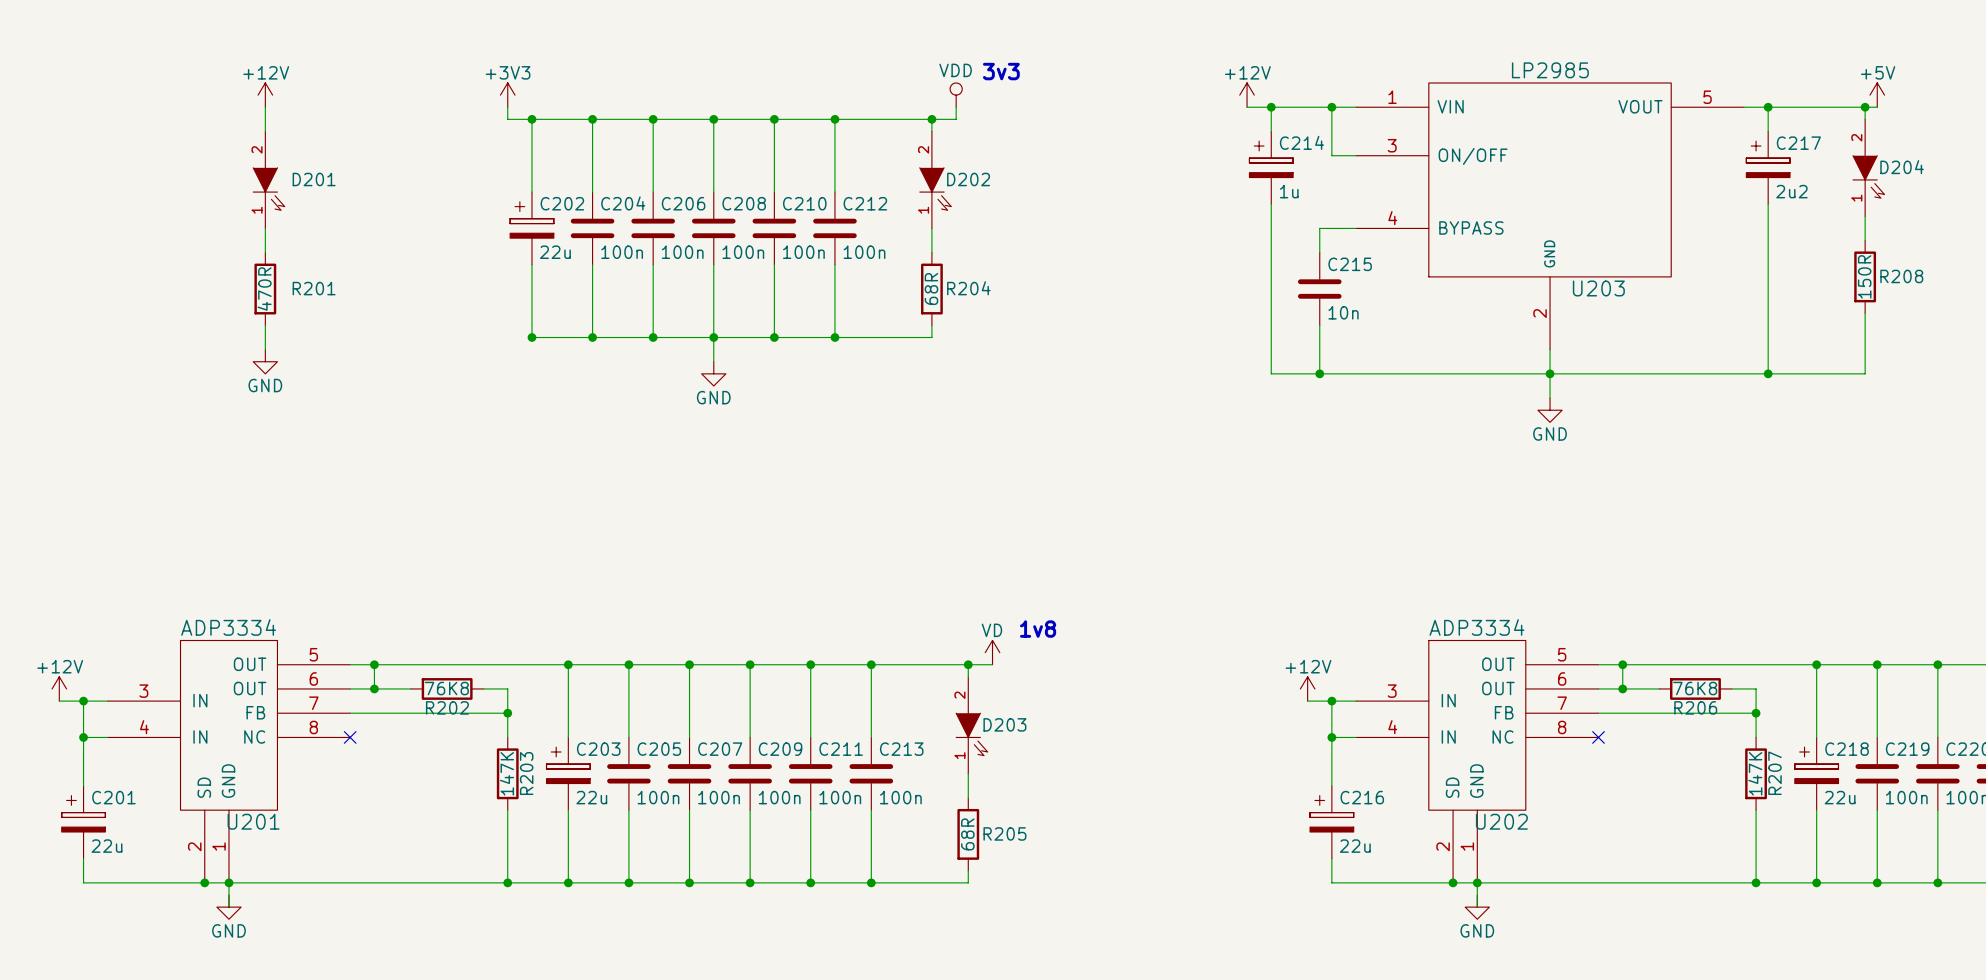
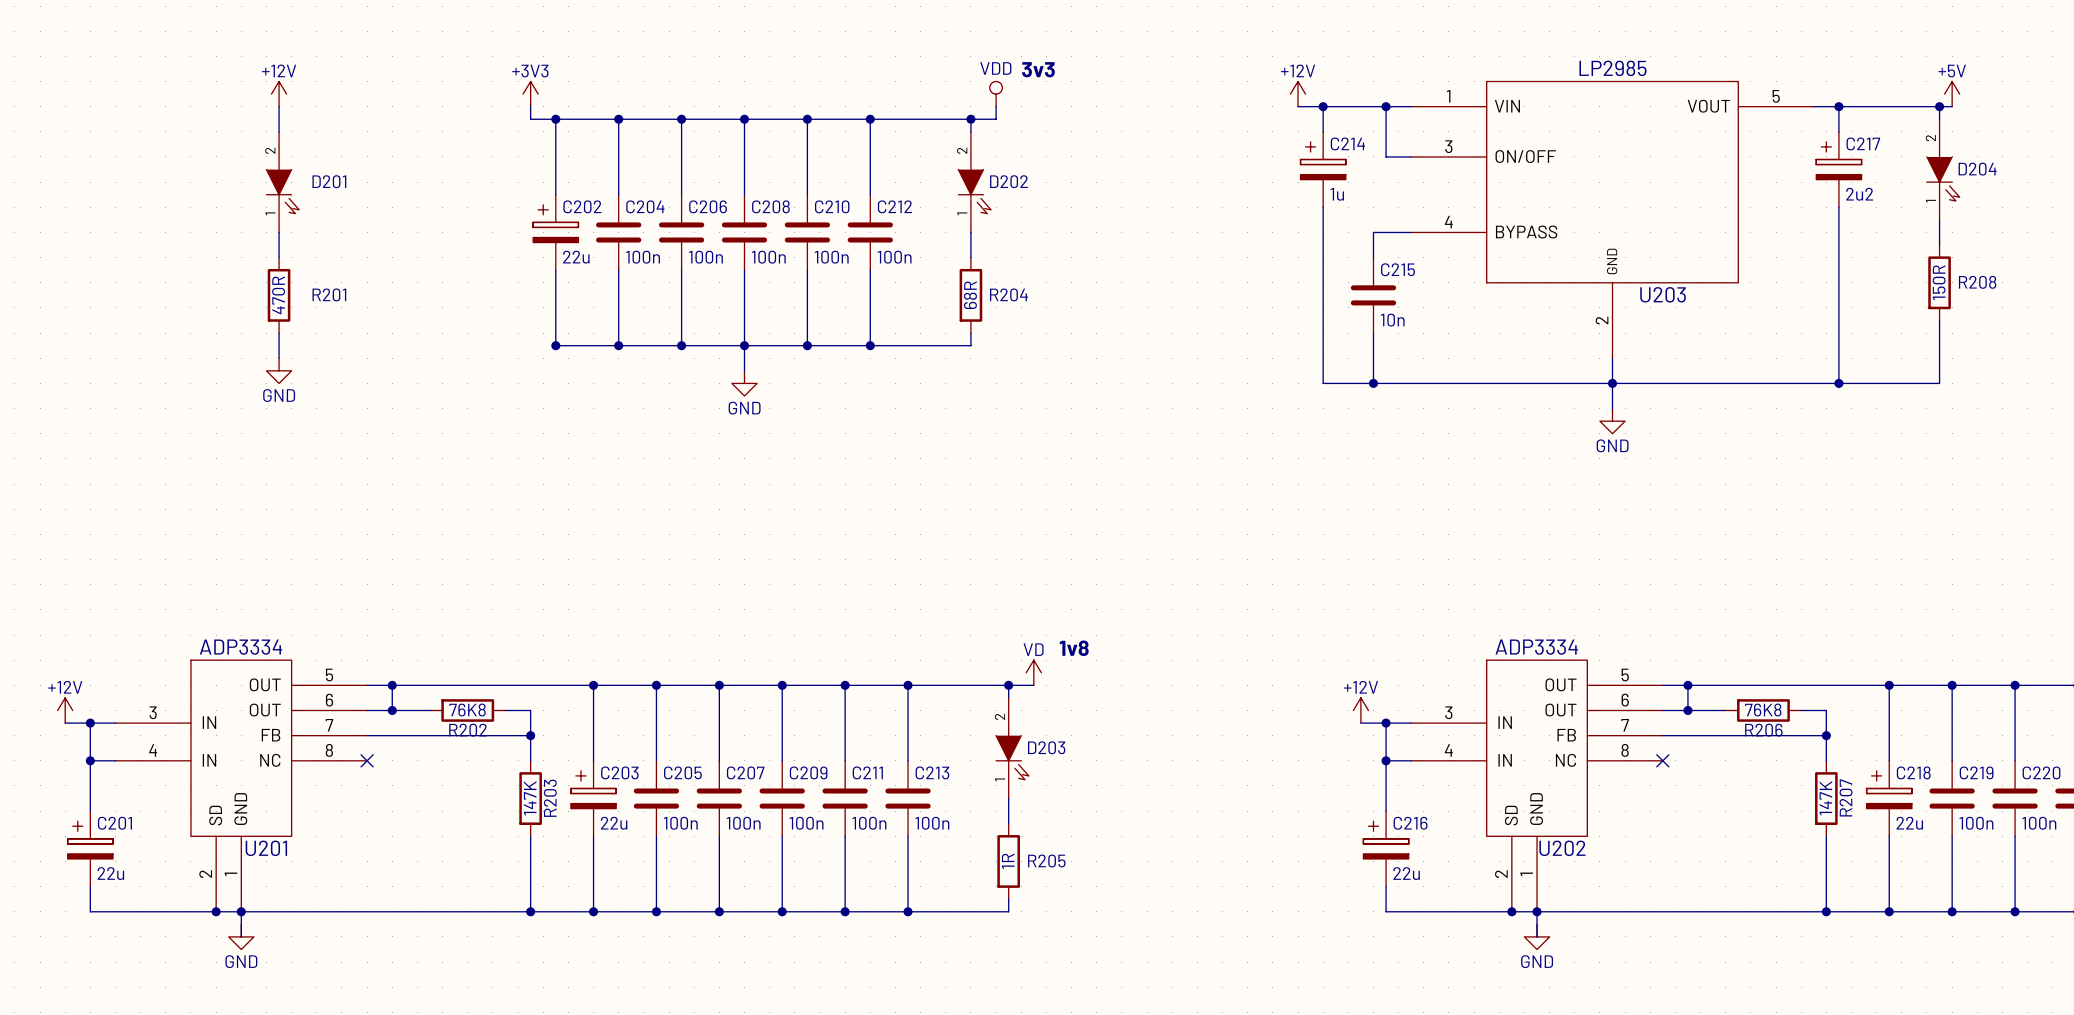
R205 value: 68R (967, 834) -> 1R (1008, 861)

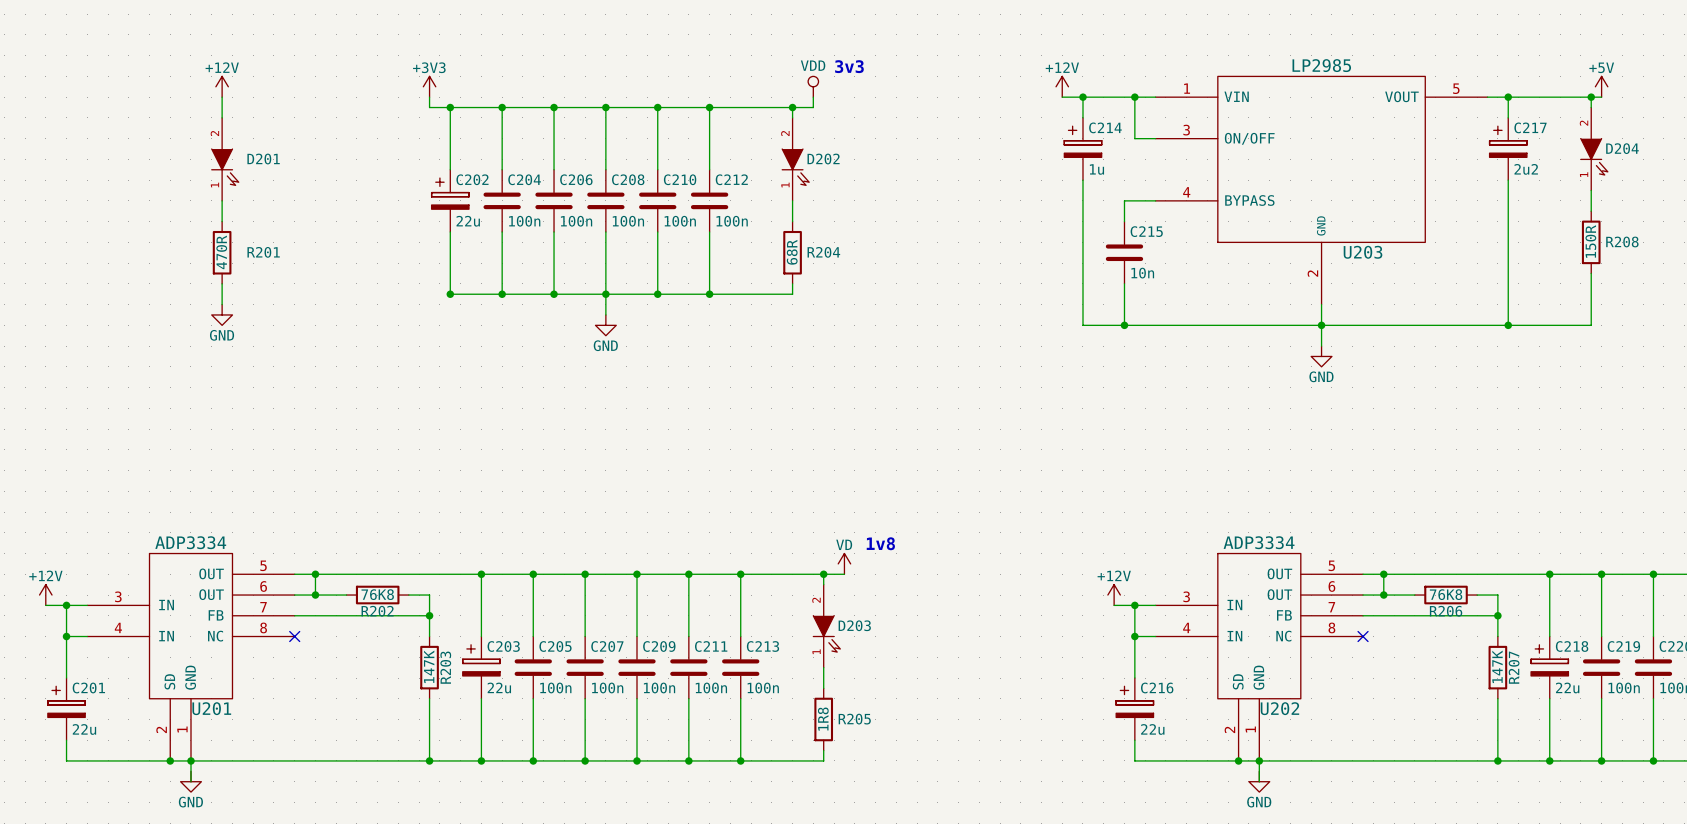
R205 value: 1R (1008, 861) -> 1R8 (823, 719)

